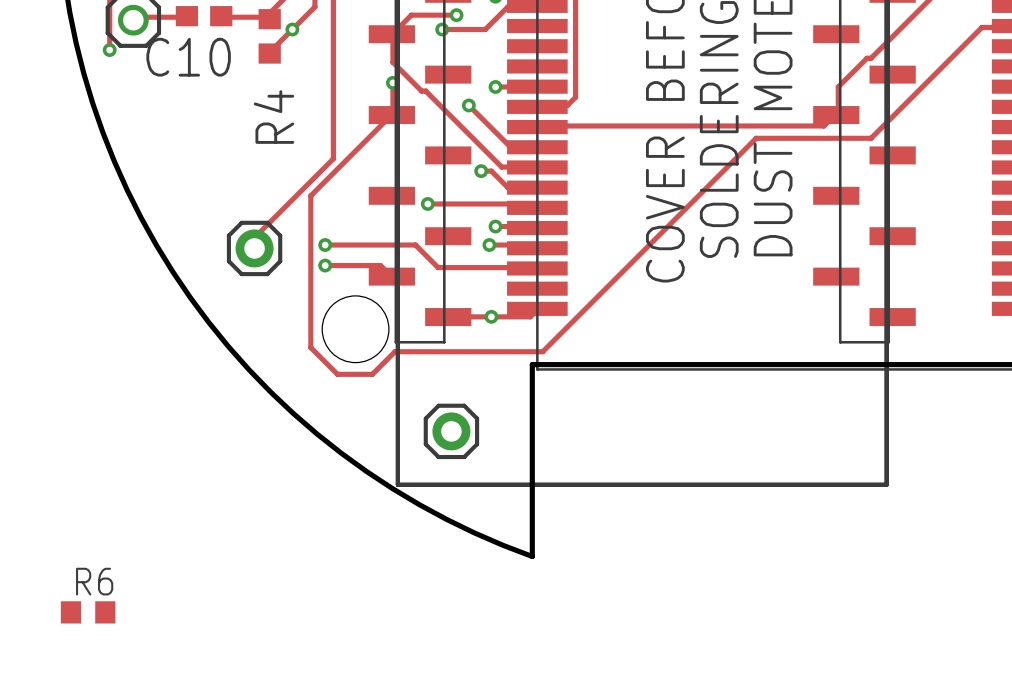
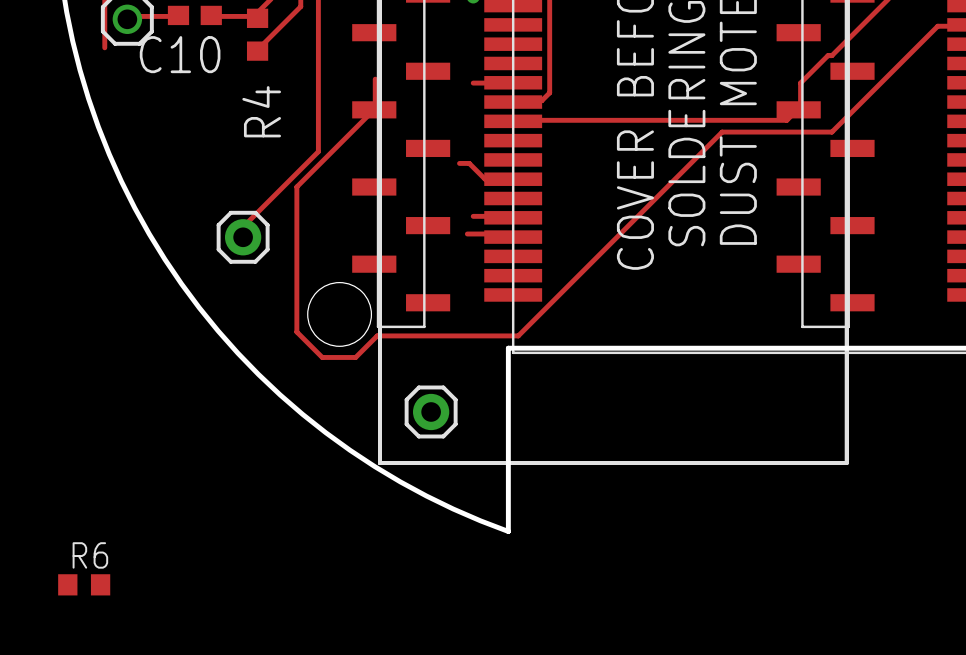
track: (537, 5) (507, 6) (485, 29) (442, 29) -> none
track: (456, 15) (411, 15) (391, 34) (392, 62) (421, 91) (425, 91) (501, 167) (537, 167) -> none
via: (456, 15) -> none
via: (292, 29) -> none
via: (442, 29) -> none
via: (109, 50) -> none
via: (392, 82) -> none
via: (495, 86) -> none
track: (468, 105) (509, 146) (537, 147) -> none
via: (468, 105) -> none
via: (481, 171) -> none
track: (427, 203) (534, 203) (537, 207) -> none
via: (427, 203) -> none
via: (495, 226) -> none
track: (325, 245) (415, 245) (438, 267) (537, 268) -> none
via: (325, 245) -> none
via: (489, 245) -> none
track: (325, 265) (380, 265) (391, 276) -> none
via: (325, 265) -> none
track: (537, 308) (530, 316) (448, 317) -> none
via: (491, 316) -> none

